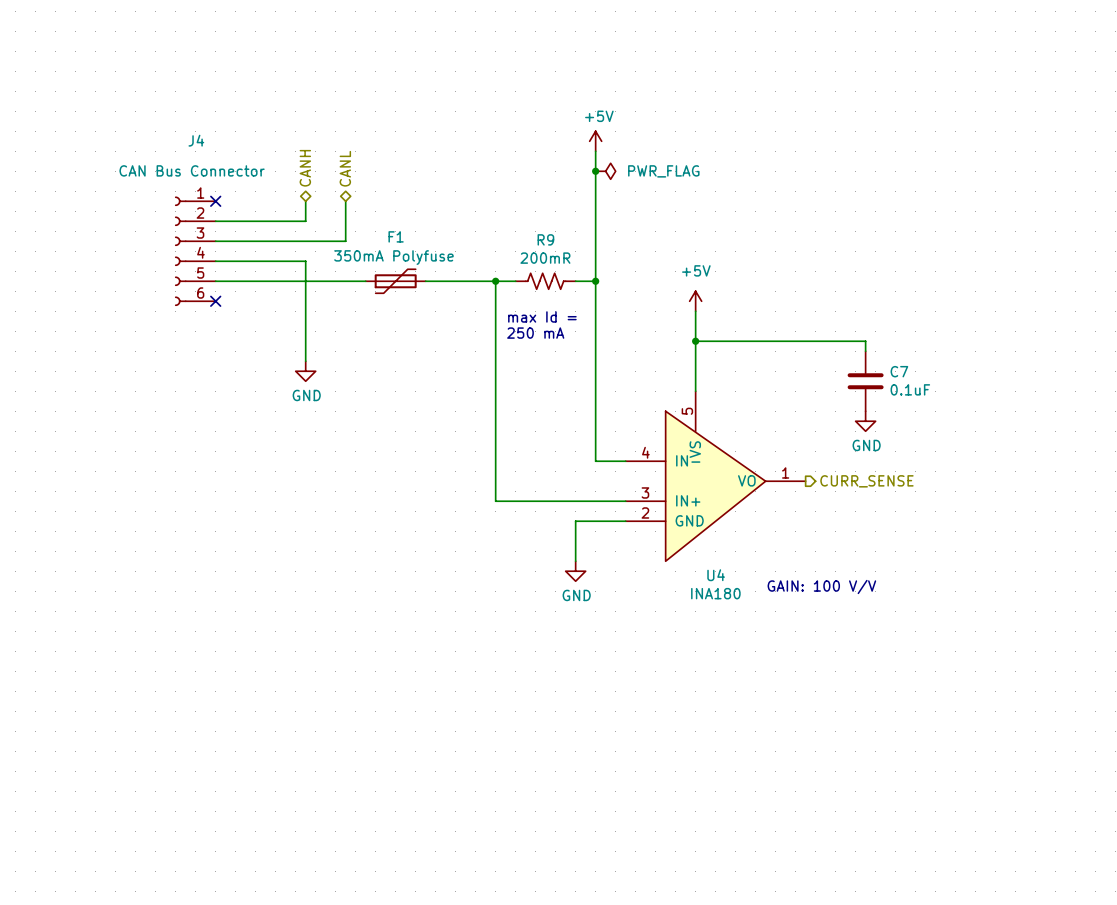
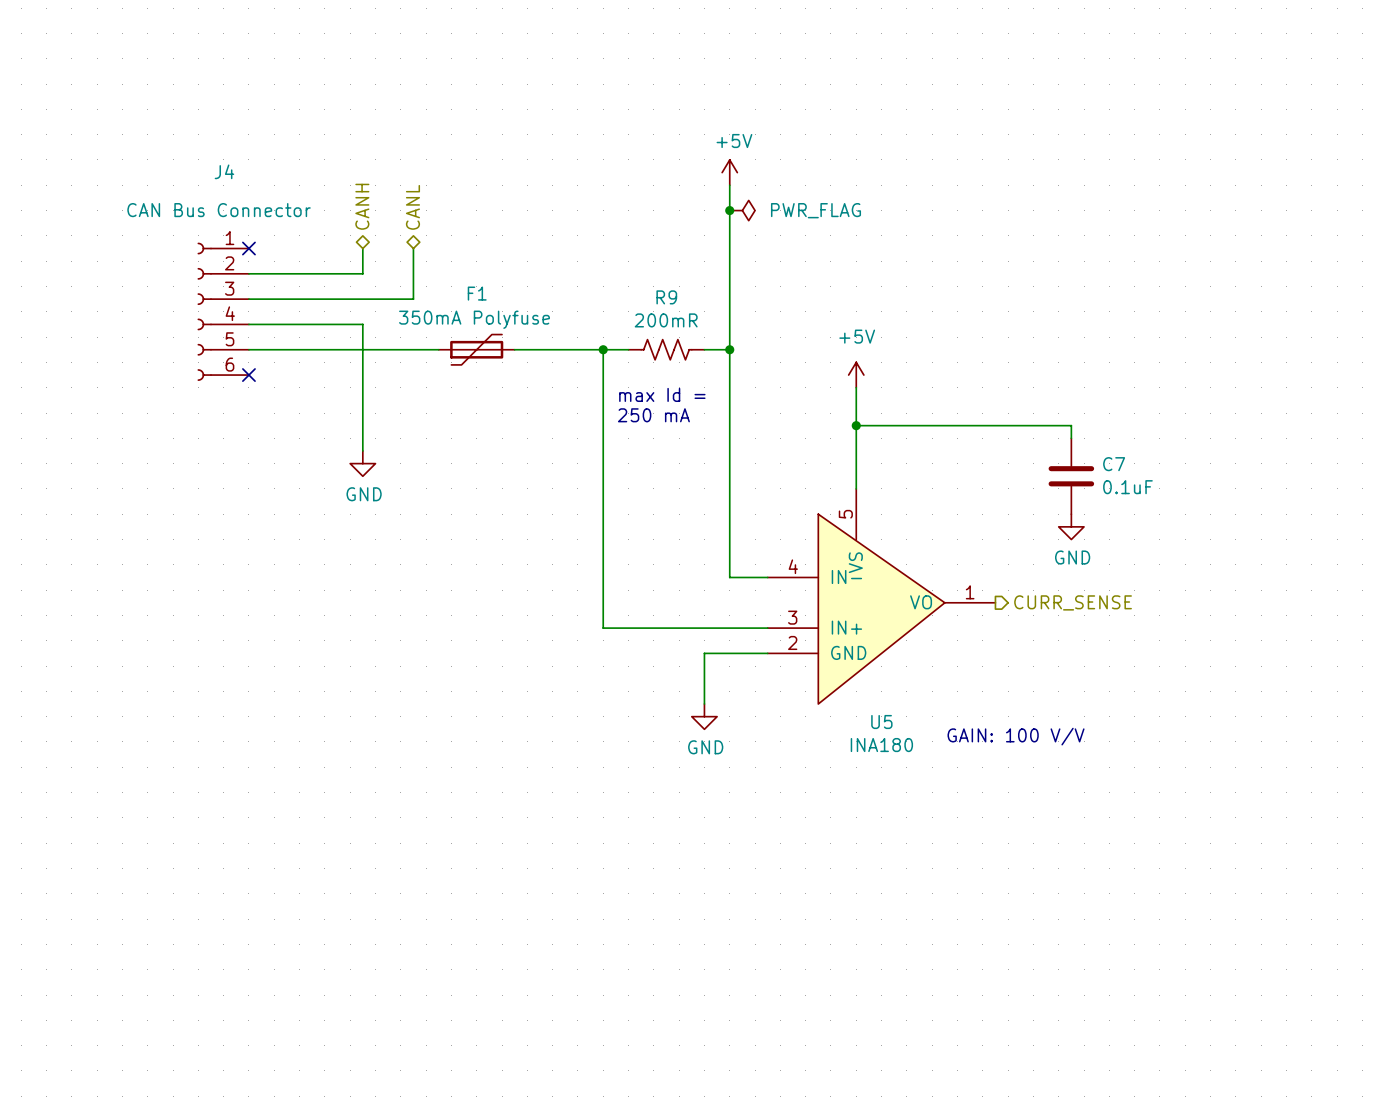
U4 name: U4 (716, 575) -> U5 (881, 722)

